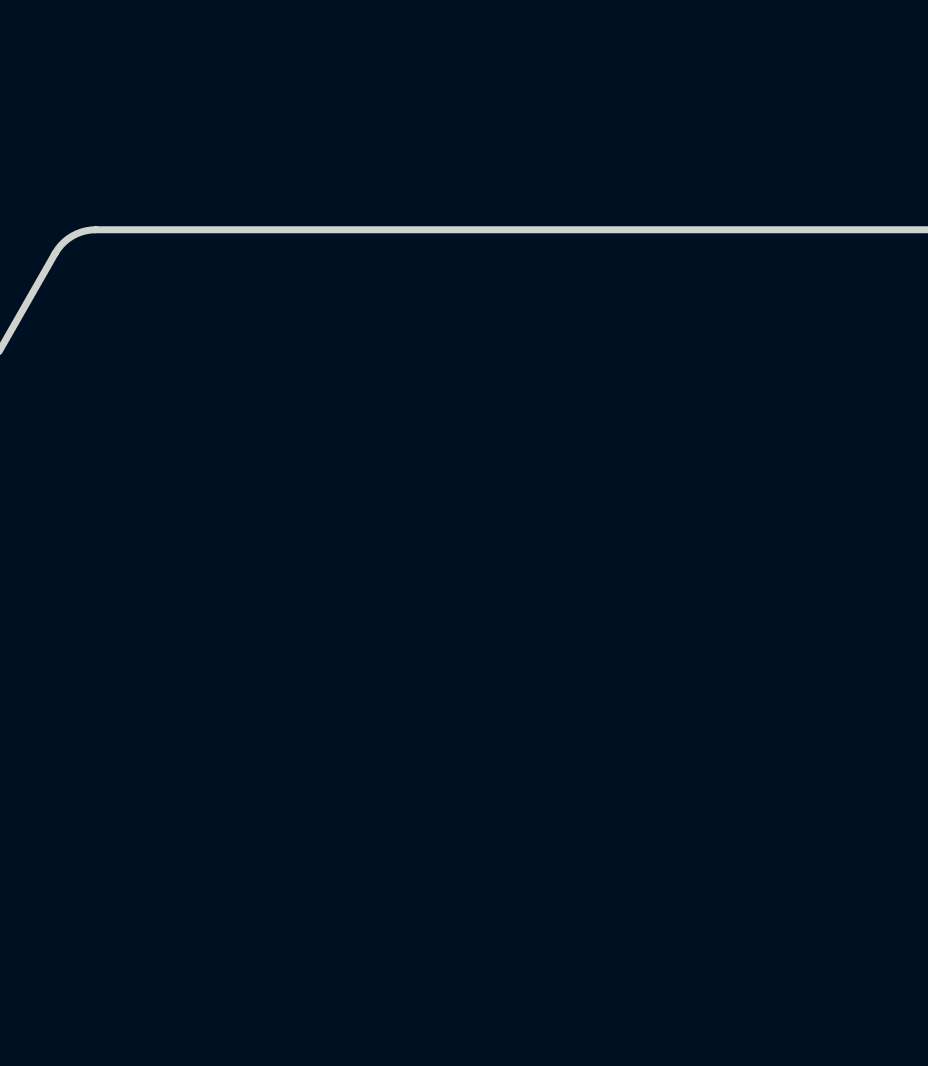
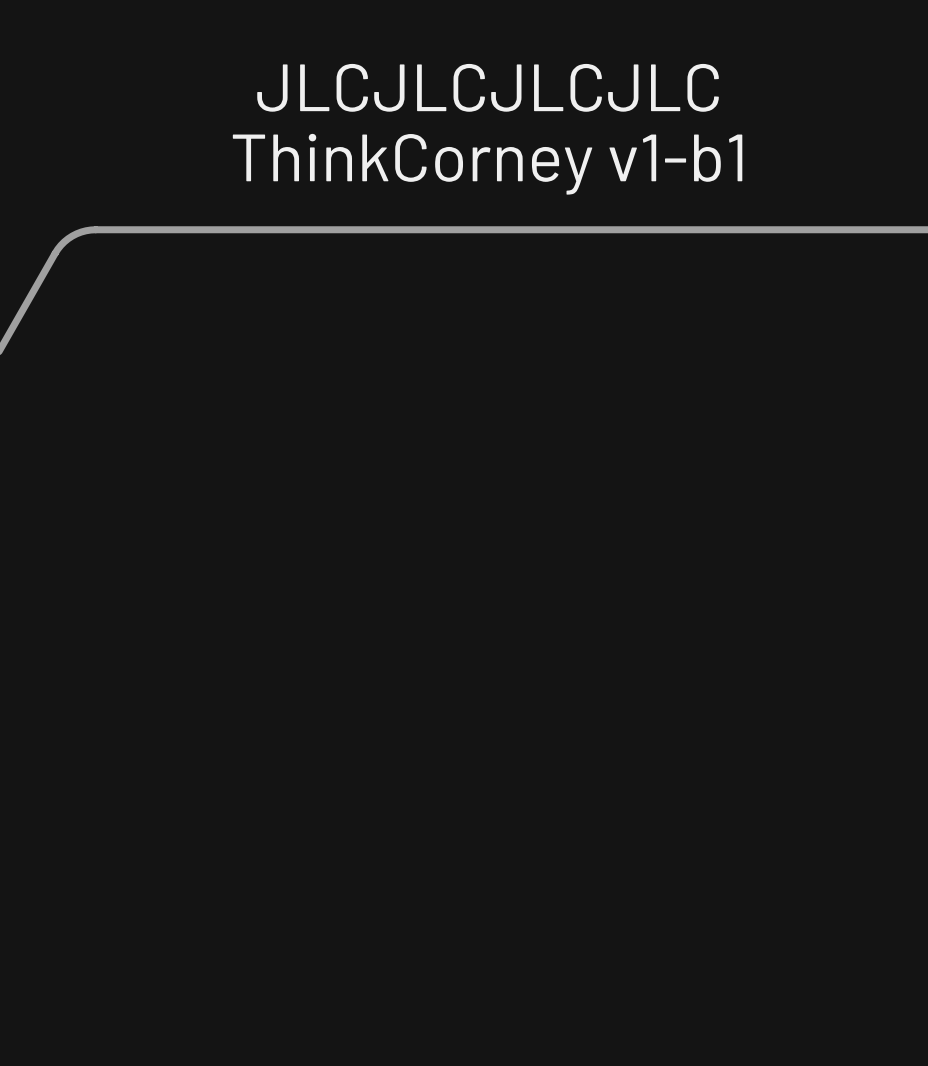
drawing: none -> [232, 63, 743, 195]

